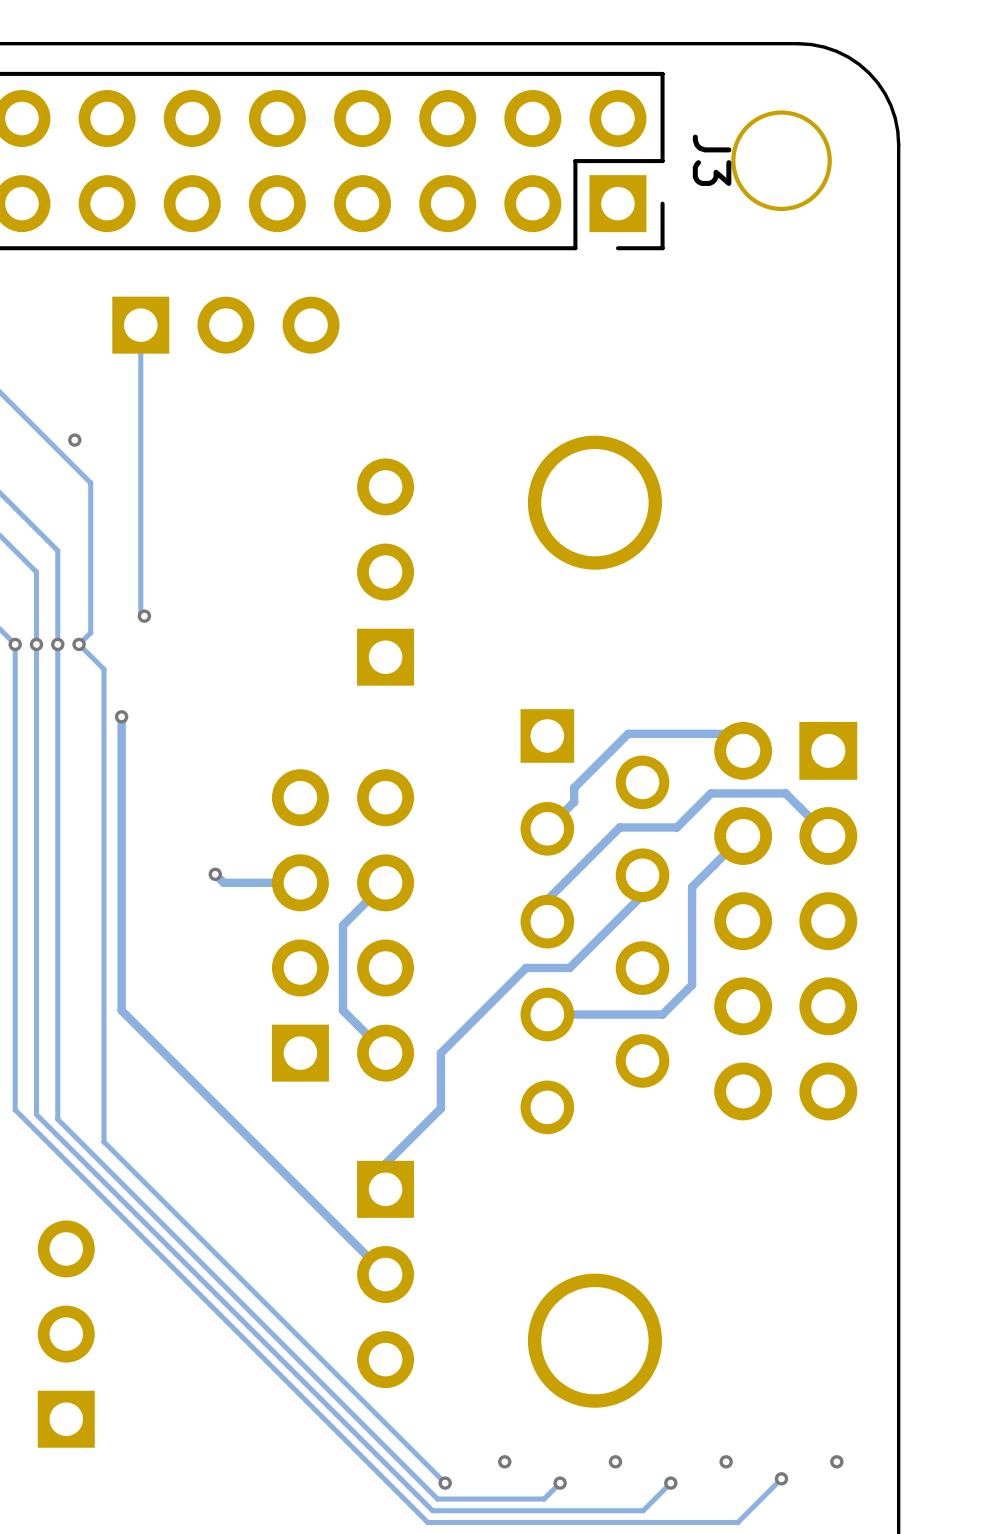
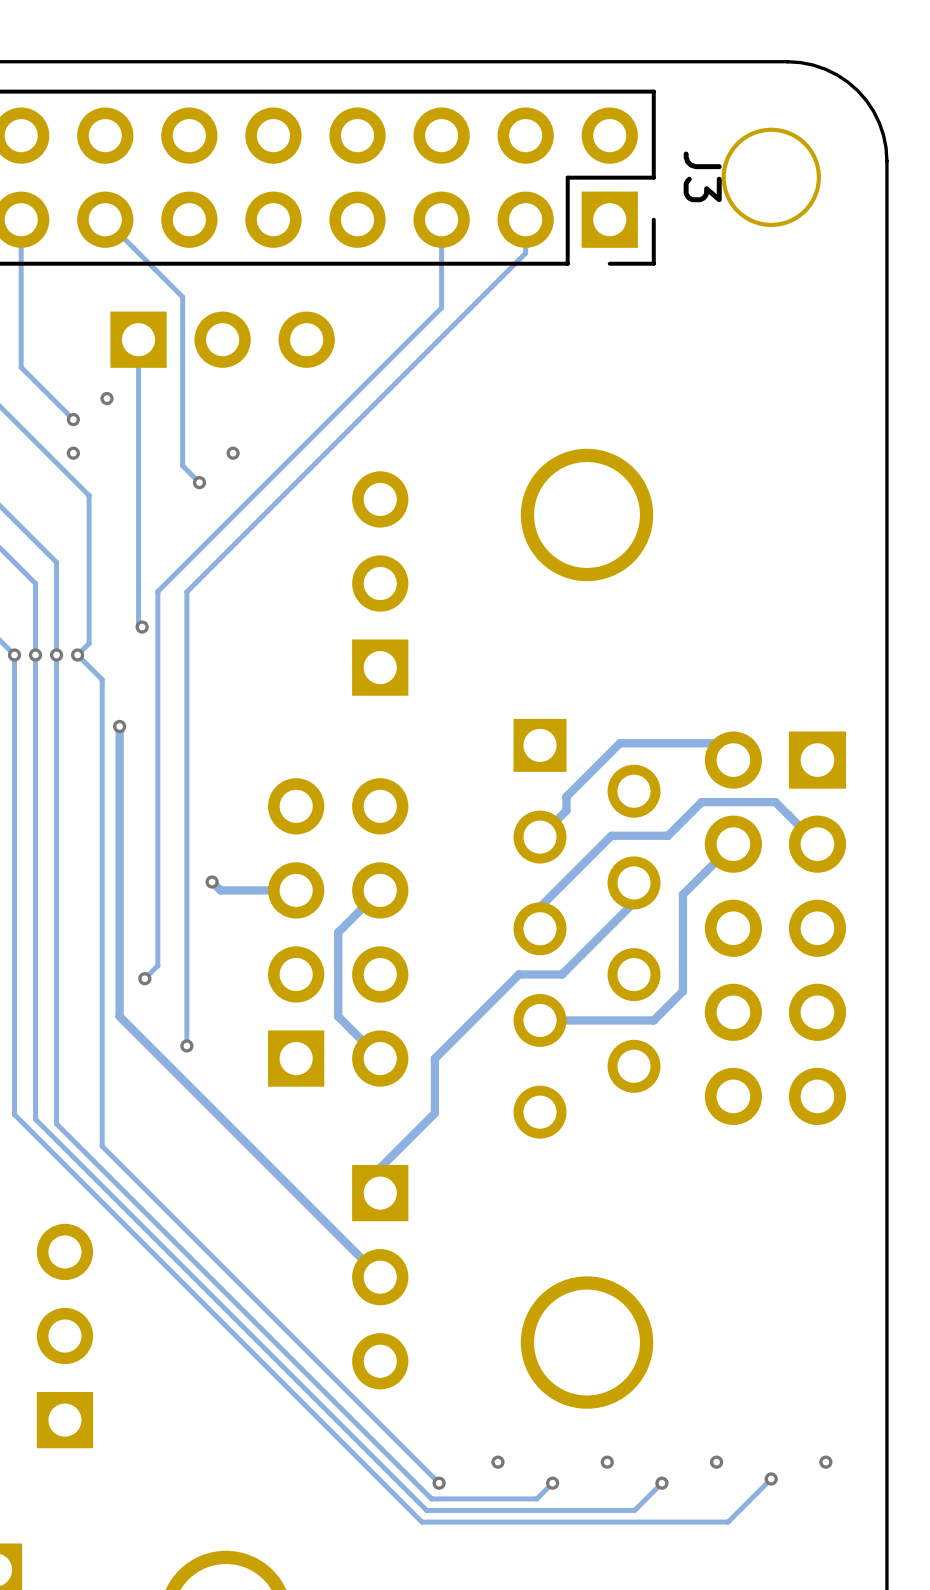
track: none -> (21, 219) (21, 367) (73, 419)
track: none -> (105, 219) (182, 297) (182, 465) (199, 482)
track: none -> (441, 219) (441, 307) (157, 591) (157, 965) (144, 978)
track: none -> (525, 219) (525, 253) (186, 591) (186, 1045)
via: none -> (107, 398)
via: none -> (73, 419)
via: none -> (233, 453)
via: none -> (199, 482)
via: none -> (144, 978)
via: none -> (186, 1045)

